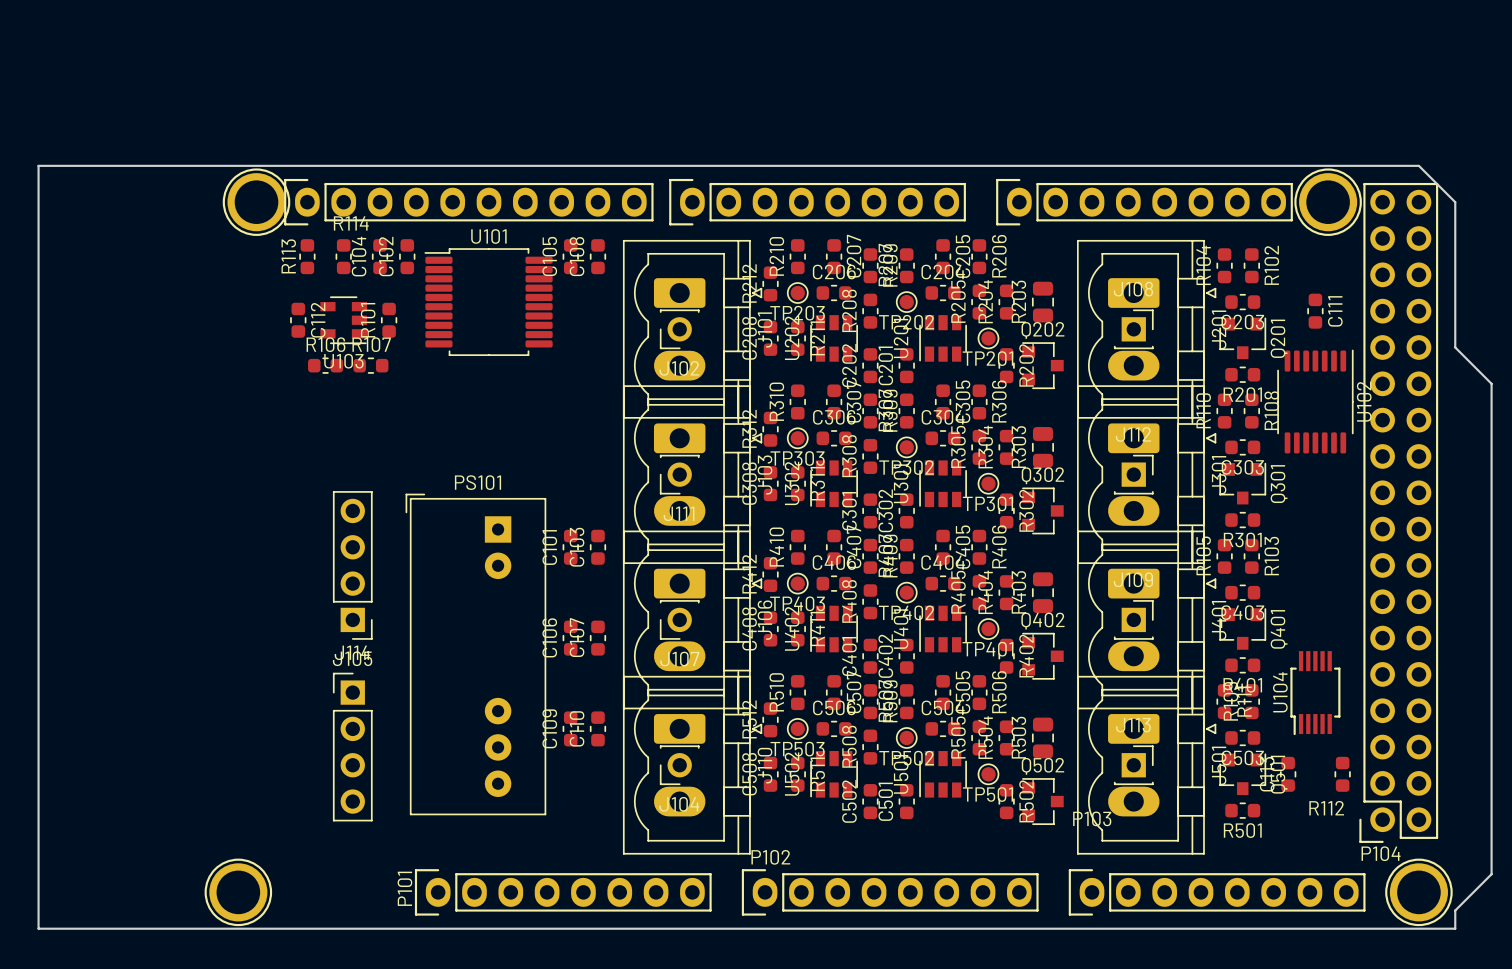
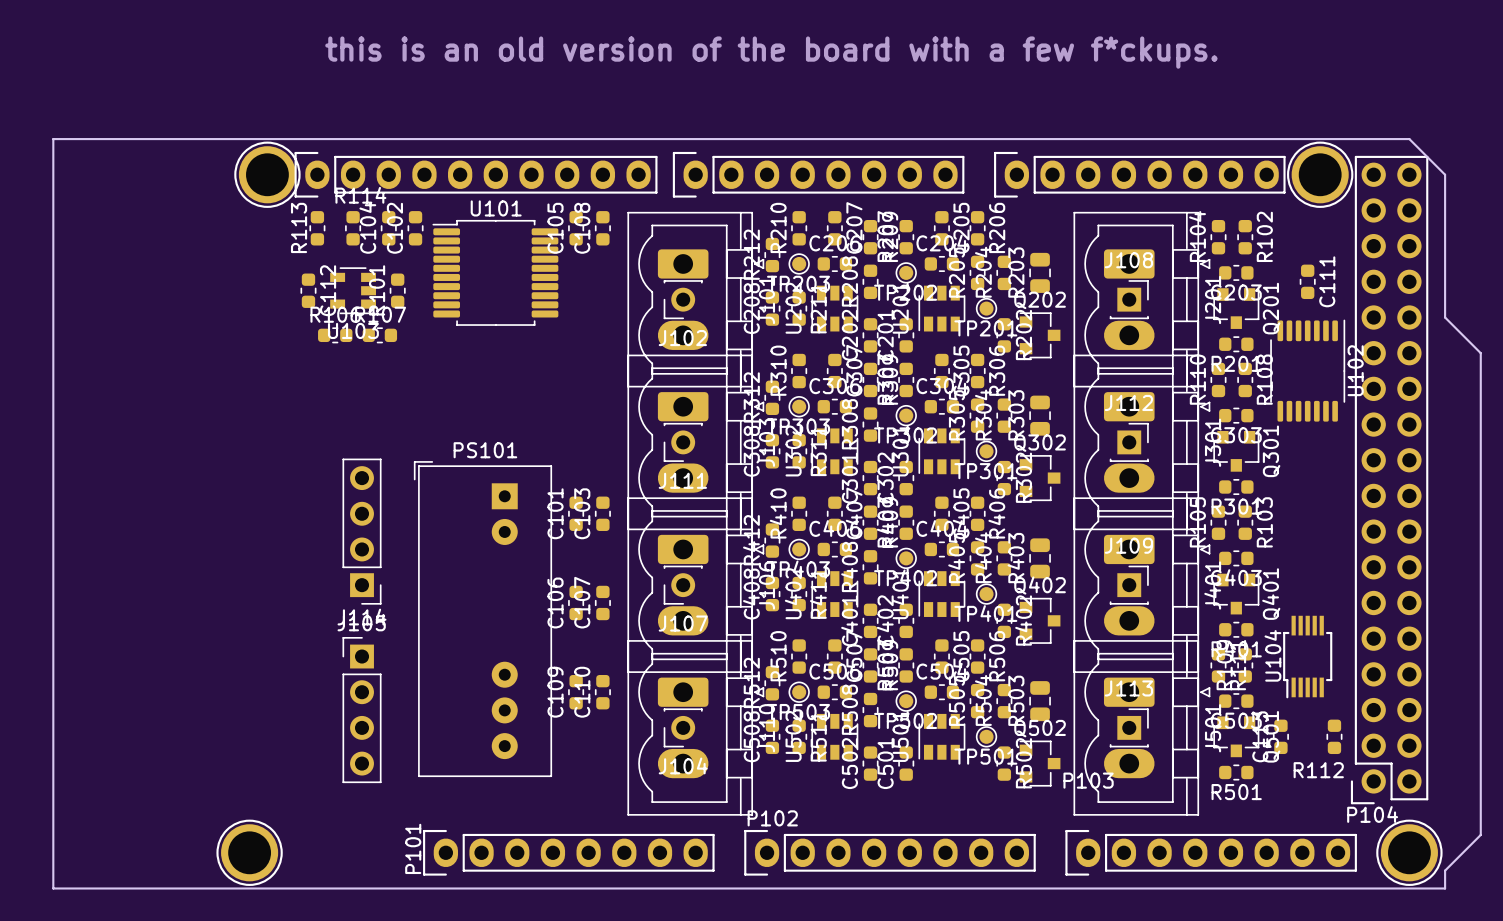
text: none -> this is an old version of the board with a few f*ckups. (771, 52)

